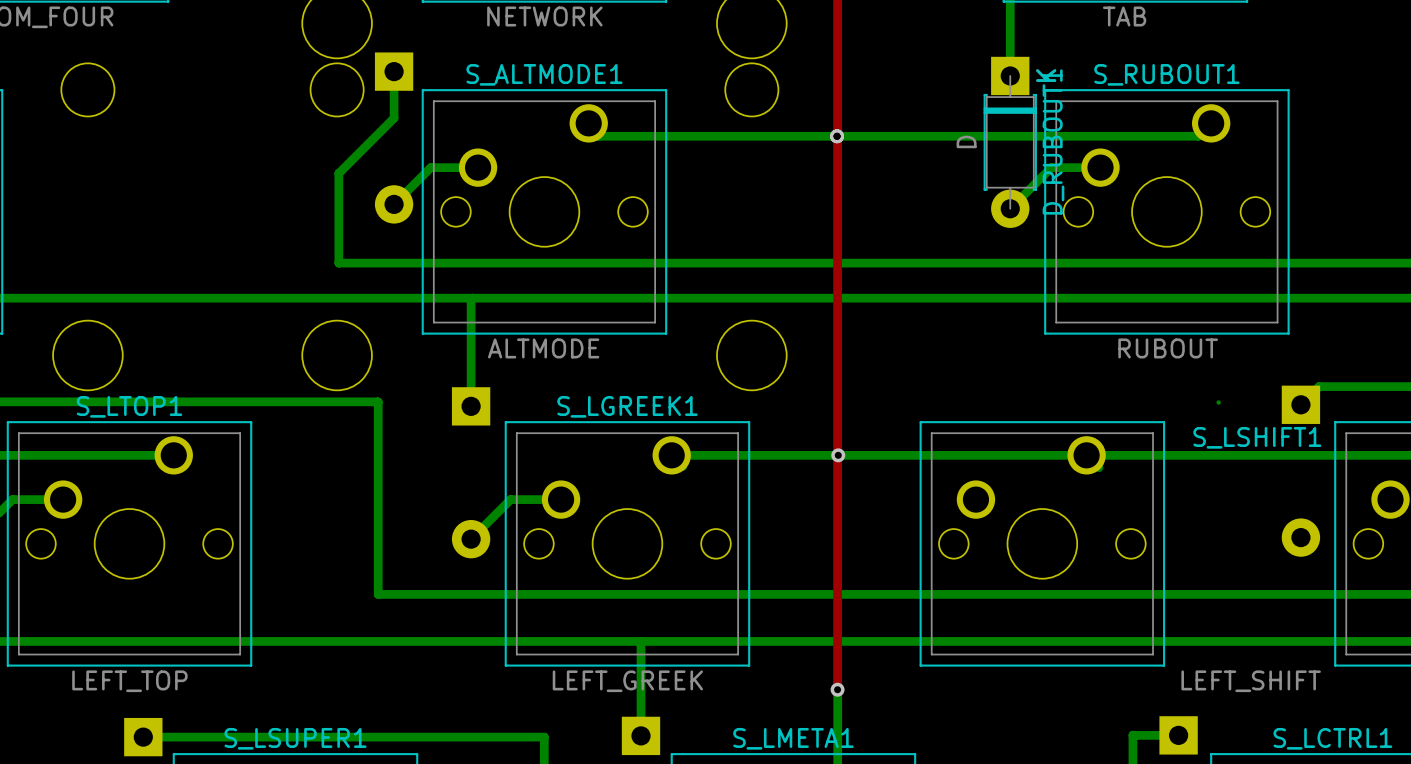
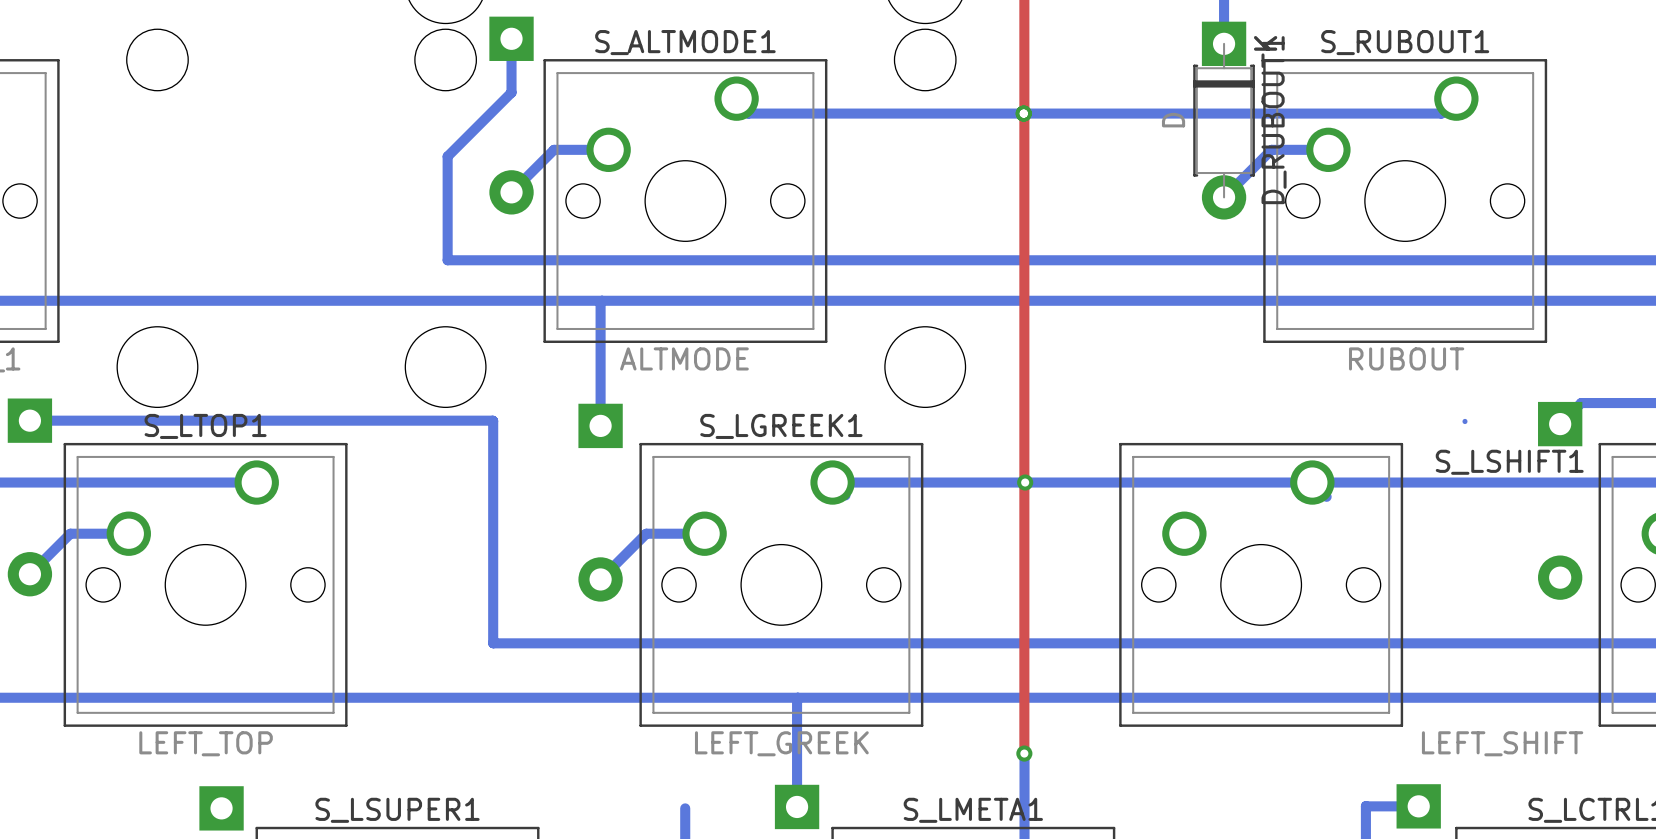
bottom track: (143, 737) (544, 737) -> none

